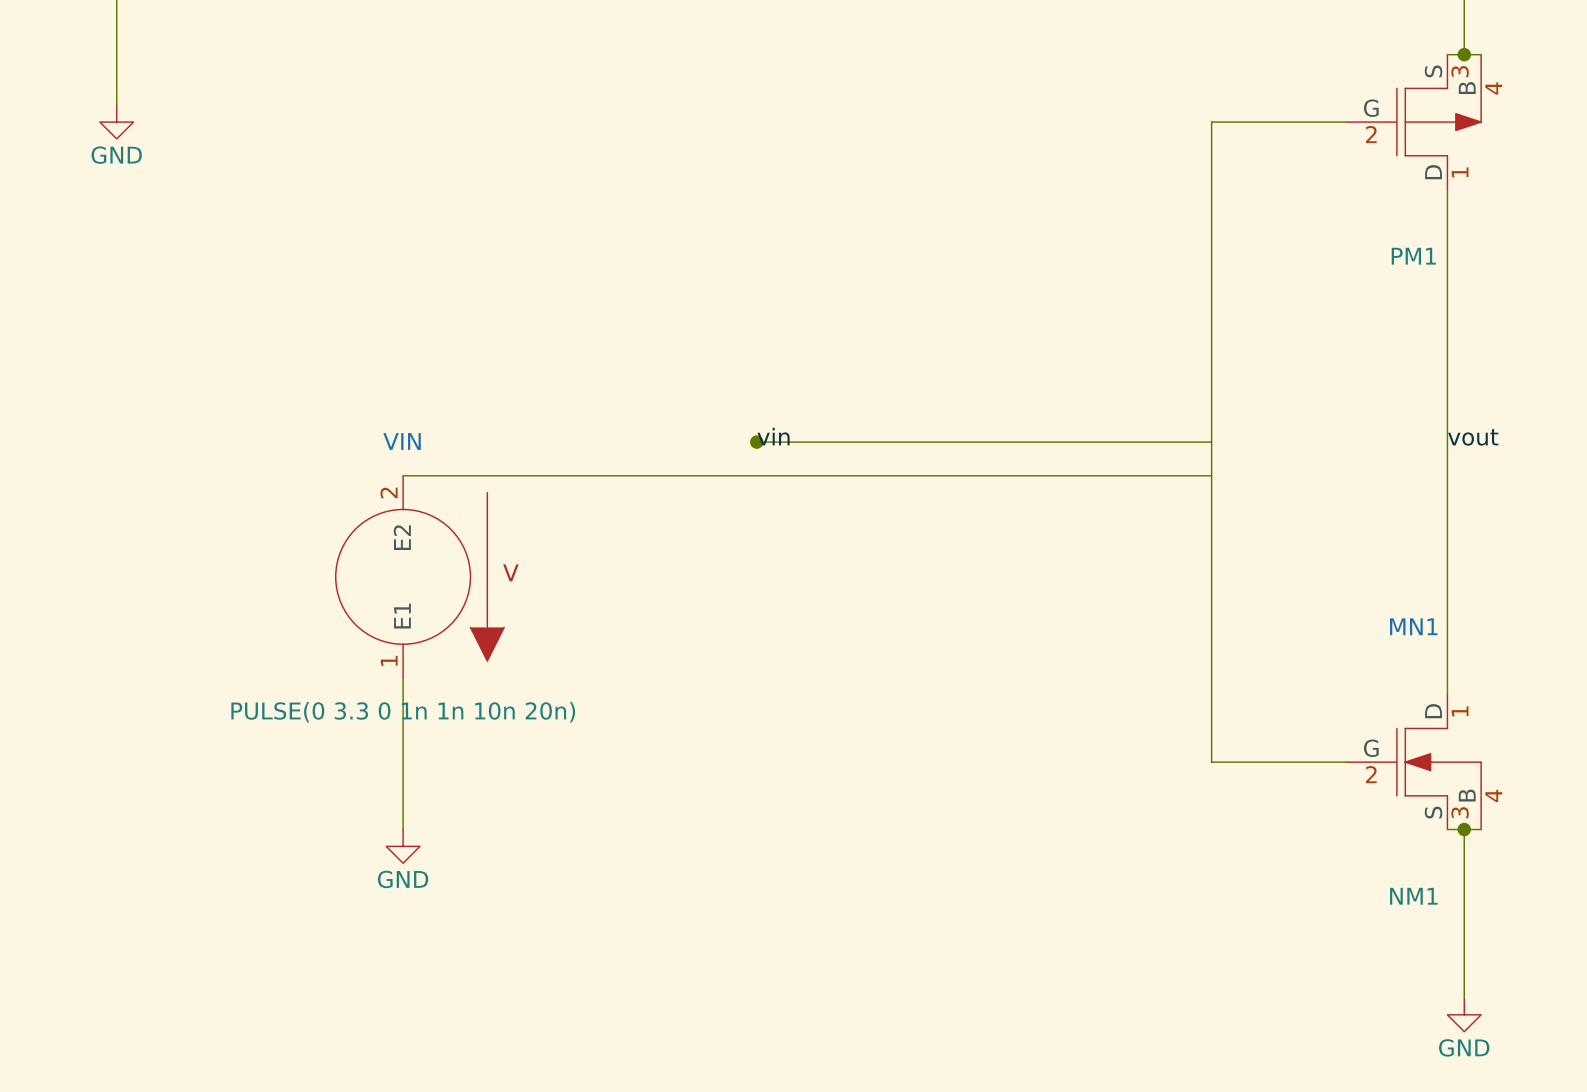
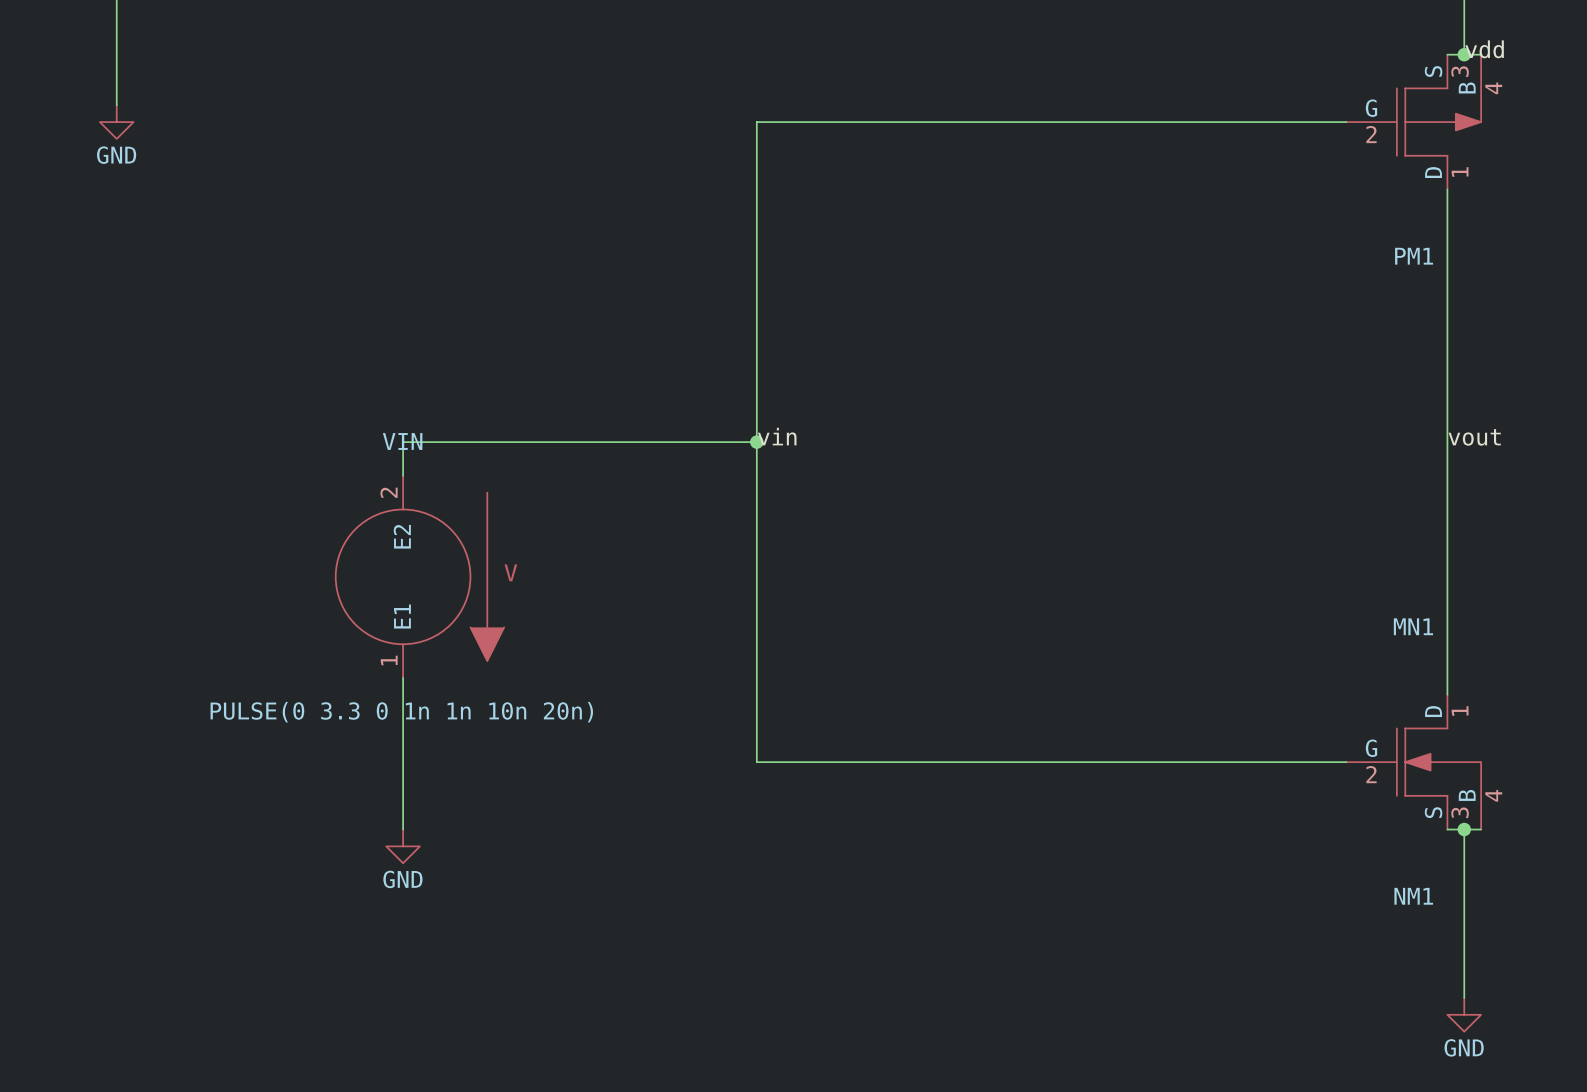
label: none -> vdd (1484, 49)
wire: (1211, 122) (1211, 762) -> (1211, 122) (756, 122) (756, 762) (1211, 762)
wire: (756, 442) (1211, 442) -> none
wire: (403, 475) (1211, 475) -> (403, 475) (403, 442) (756, 442)

